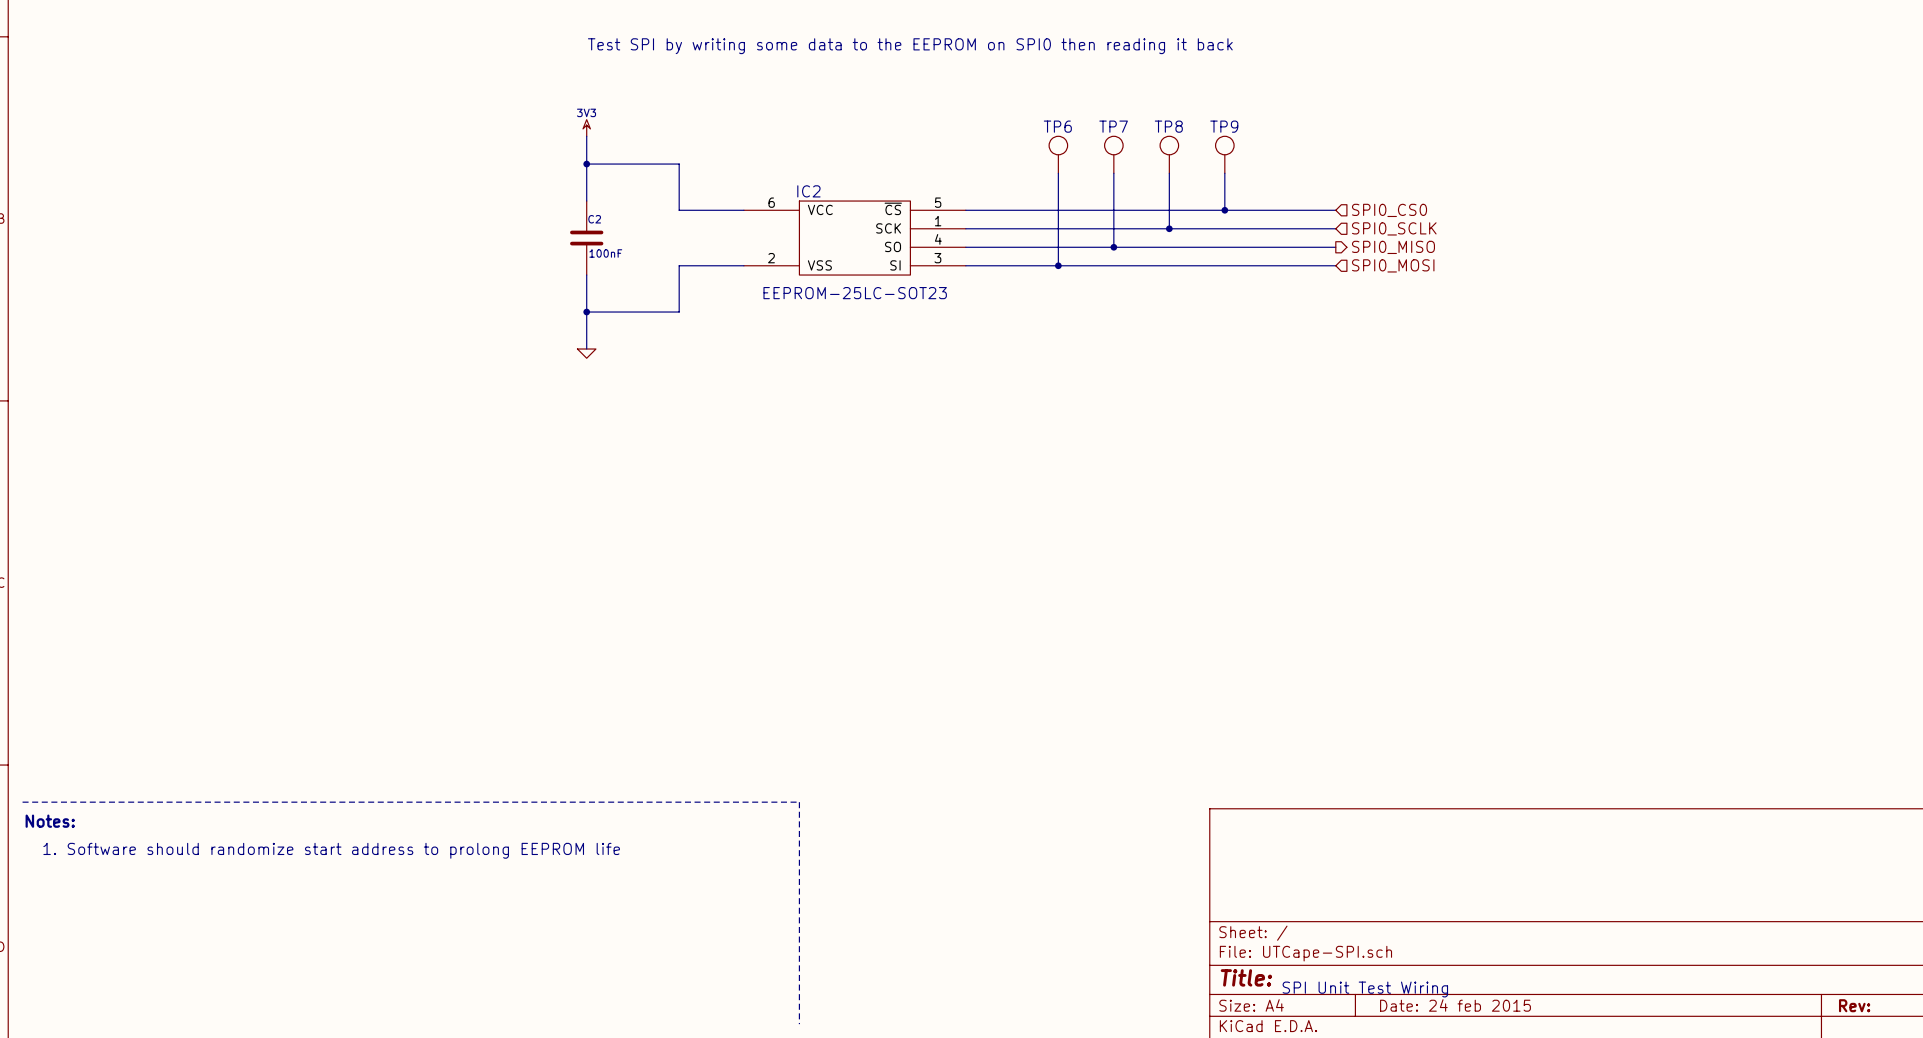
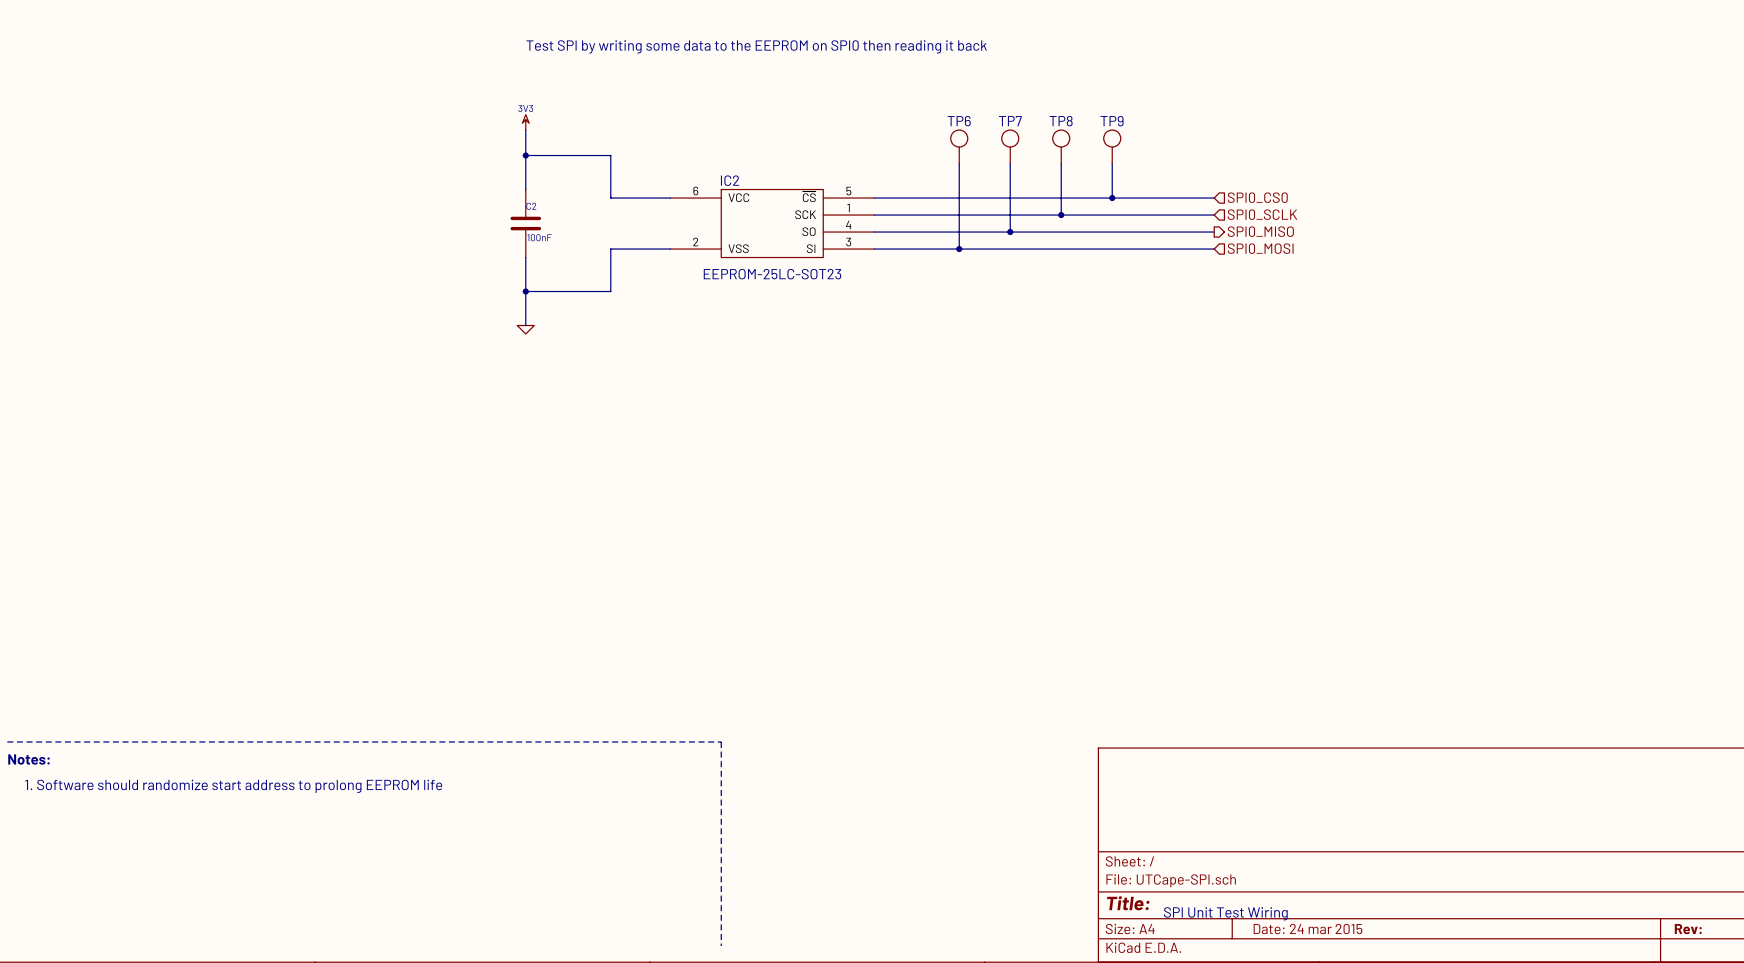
title block: Date: 24 feb 2015 (1455, 1005) -> Date: 24 mar 2015 (1307, 929)

